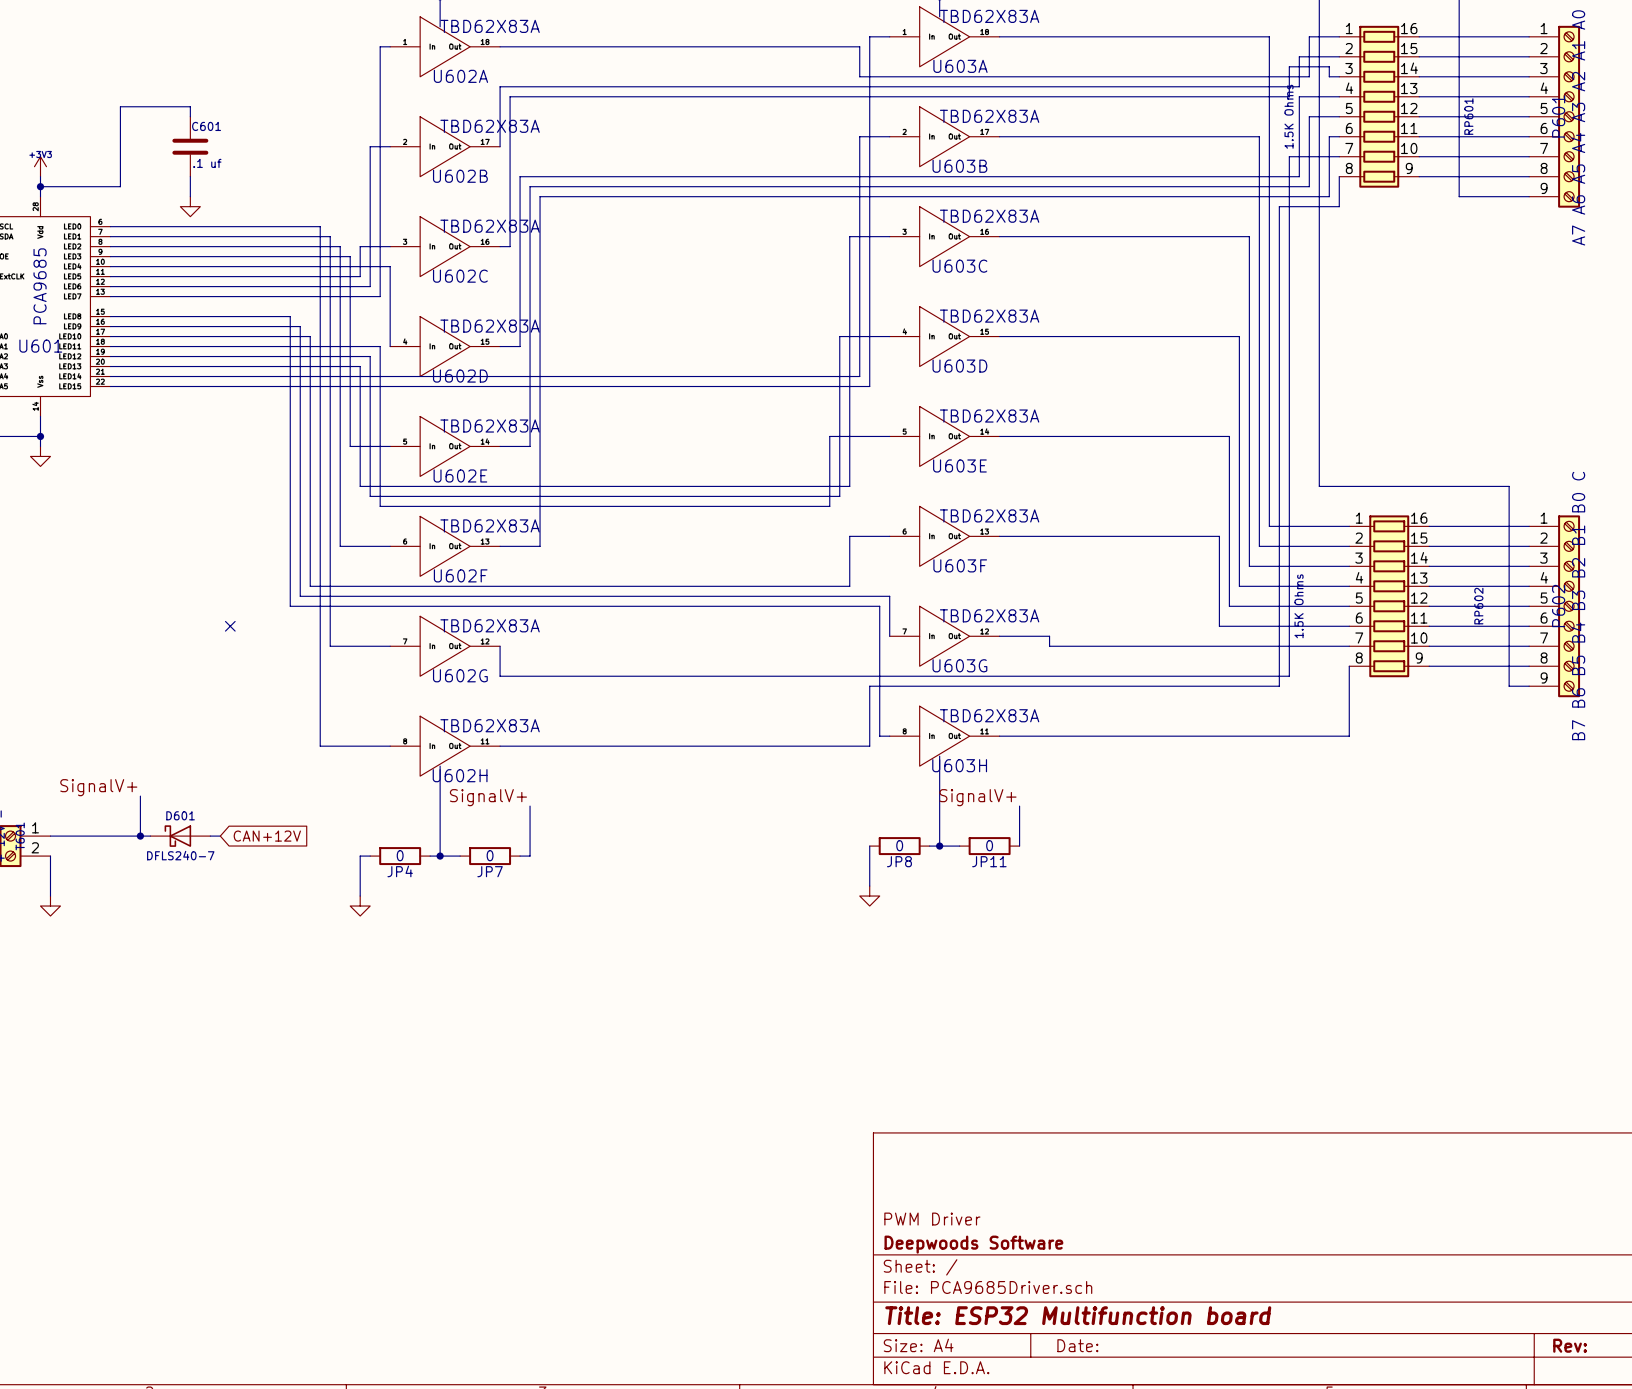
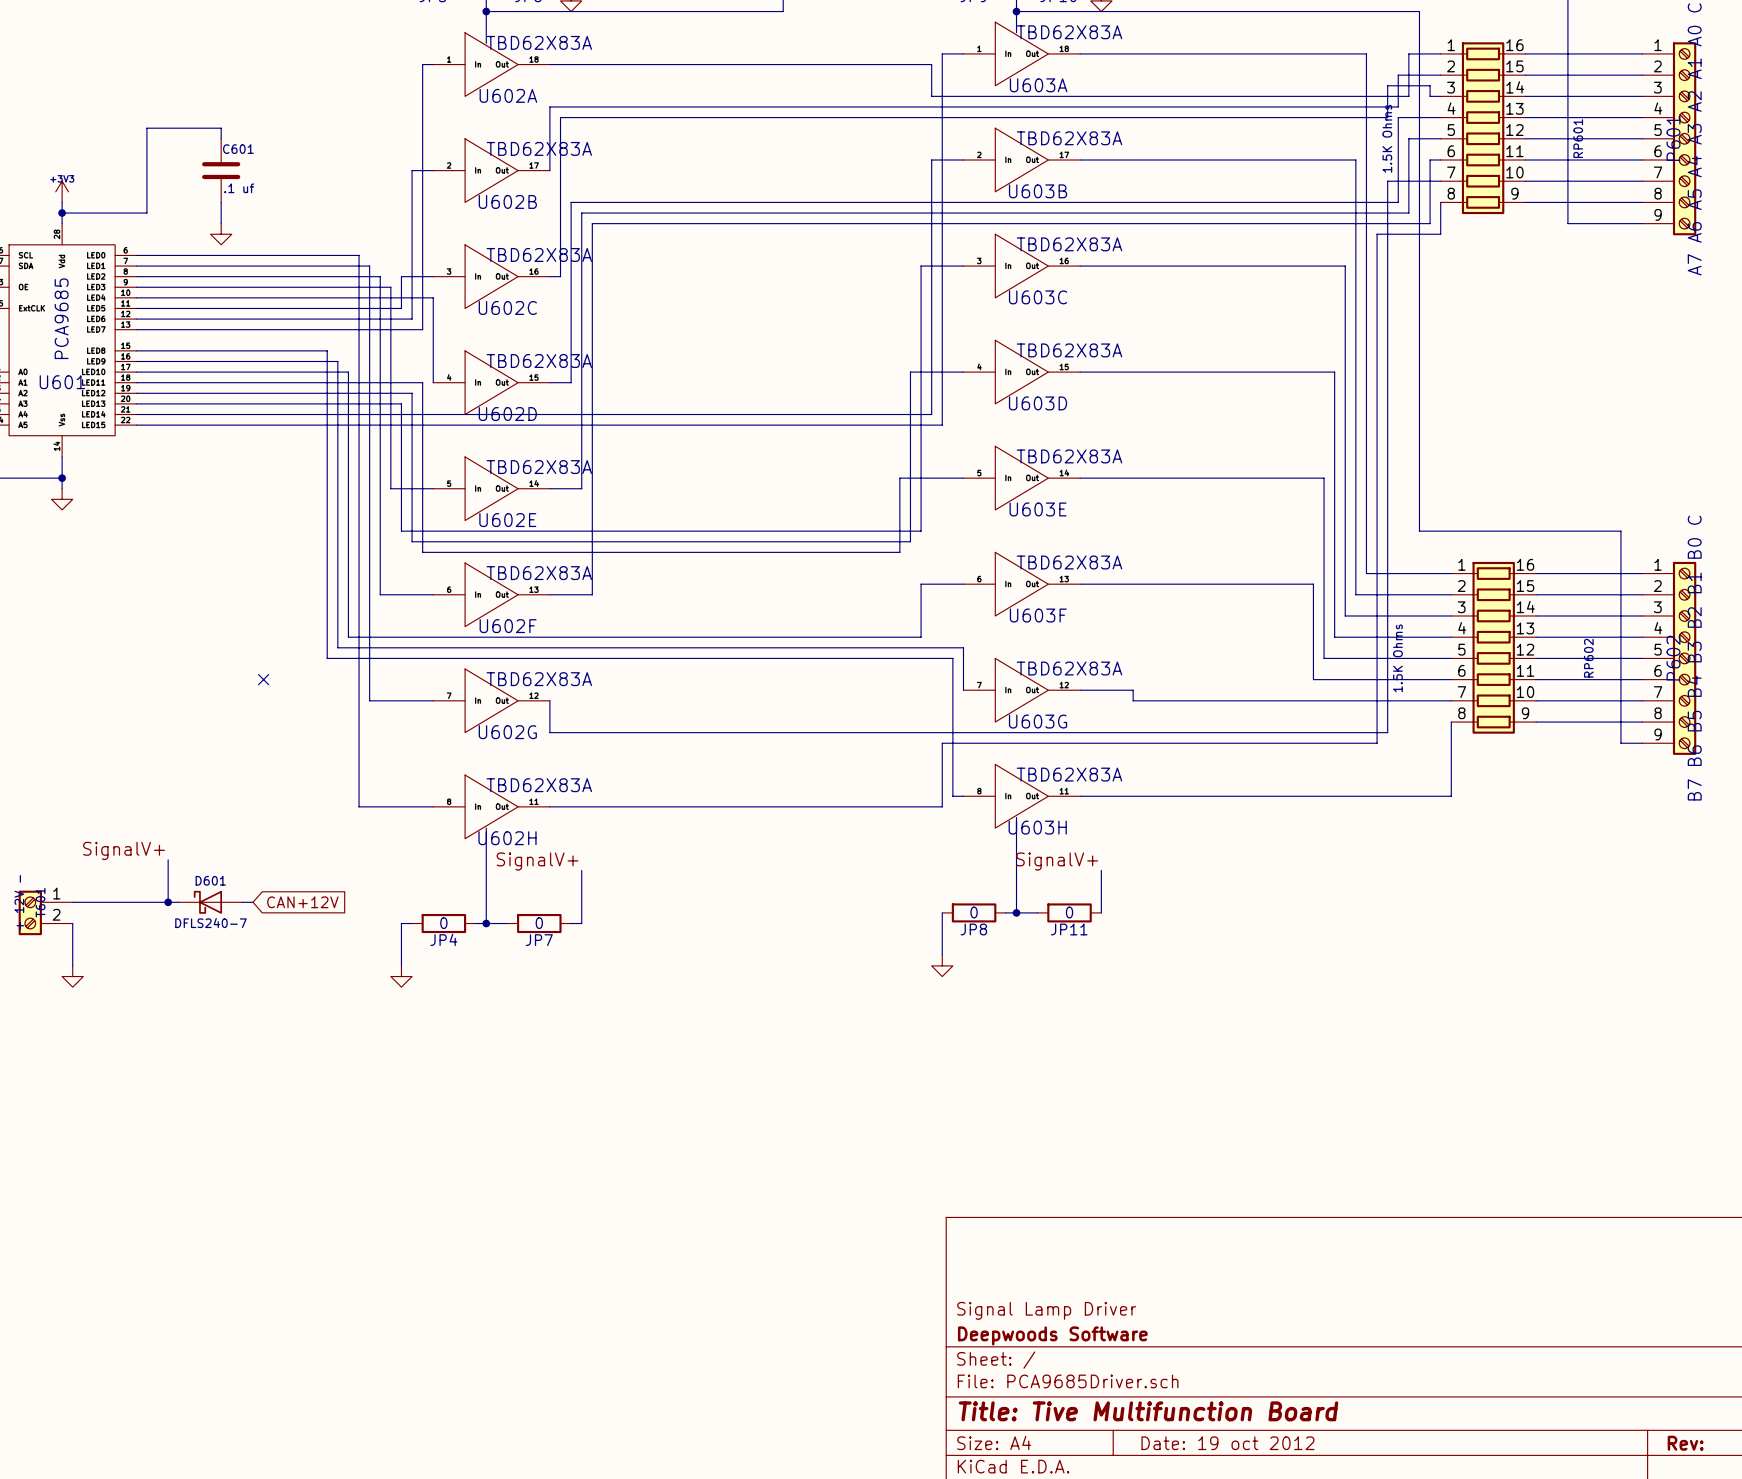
title block: PWM Driver (932, 1219) -> Signal Lamp Driver (1046, 1310)
title block: Title: ESP32 Multifunction board (1078, 1315) -> Title: Tive Multifunction Board (1148, 1411)
title block: Date: (1077, 1345) -> Date: 19 oct 2012 (1227, 1443)

